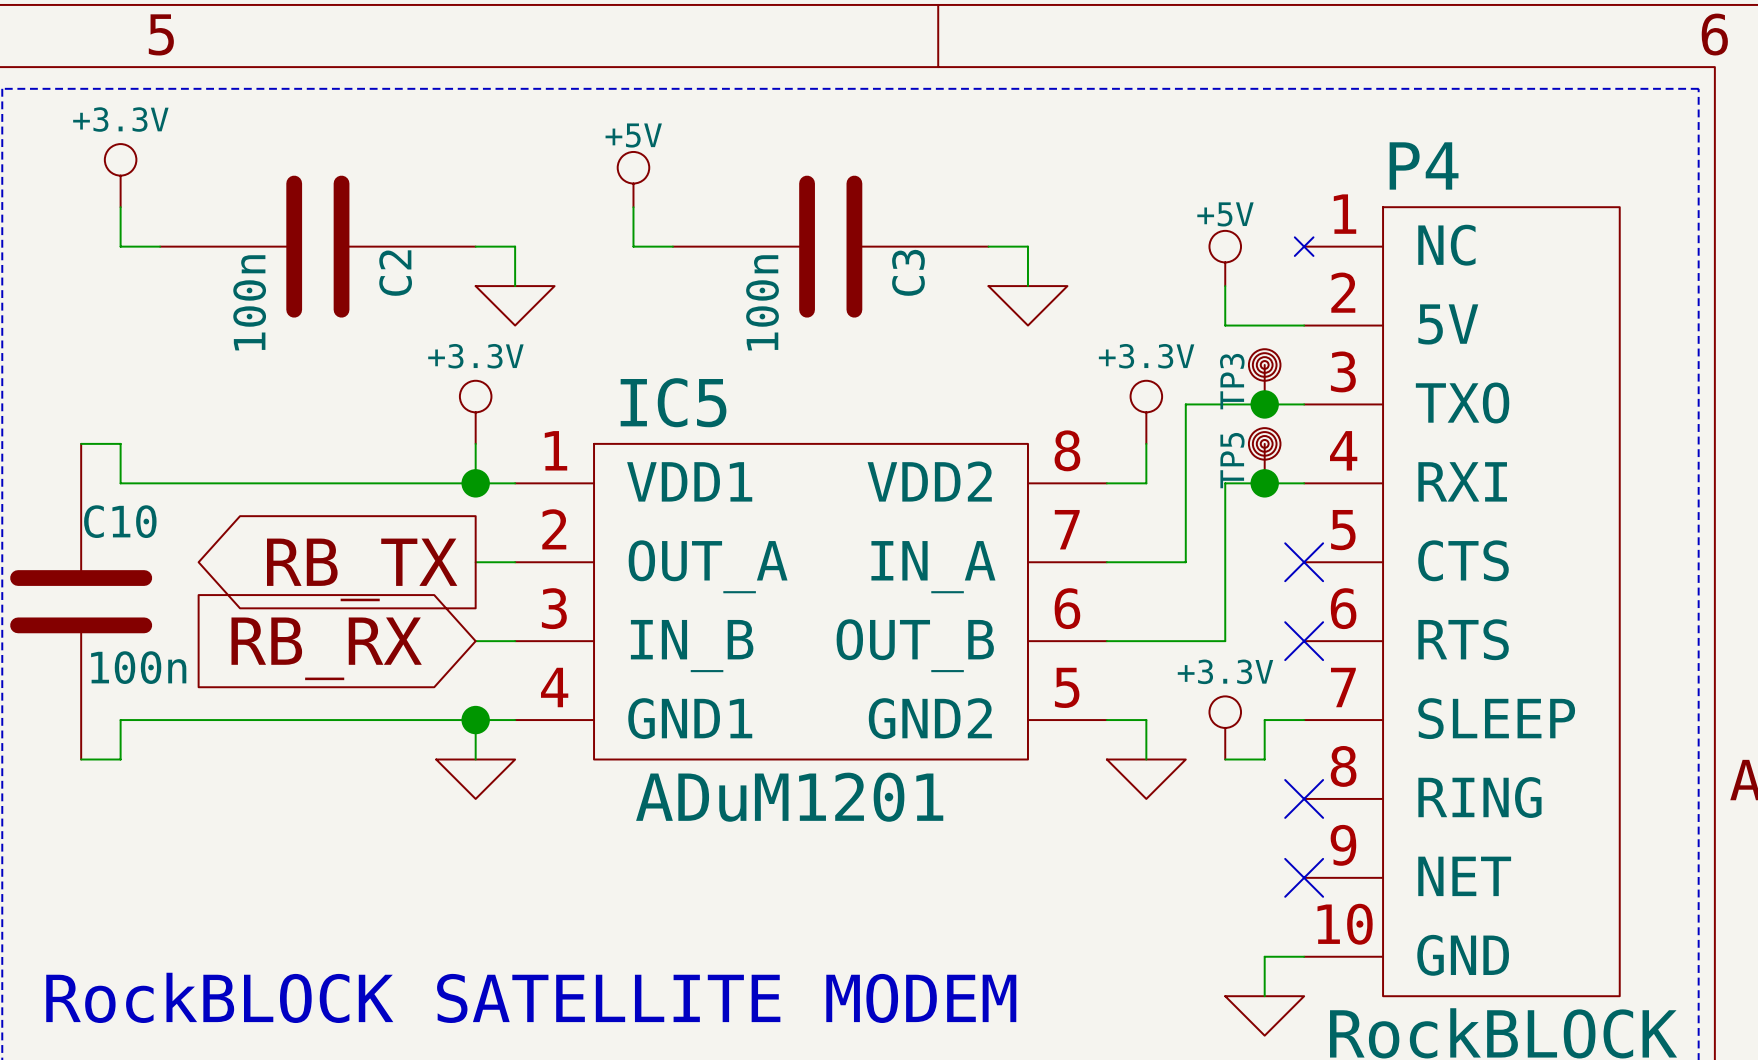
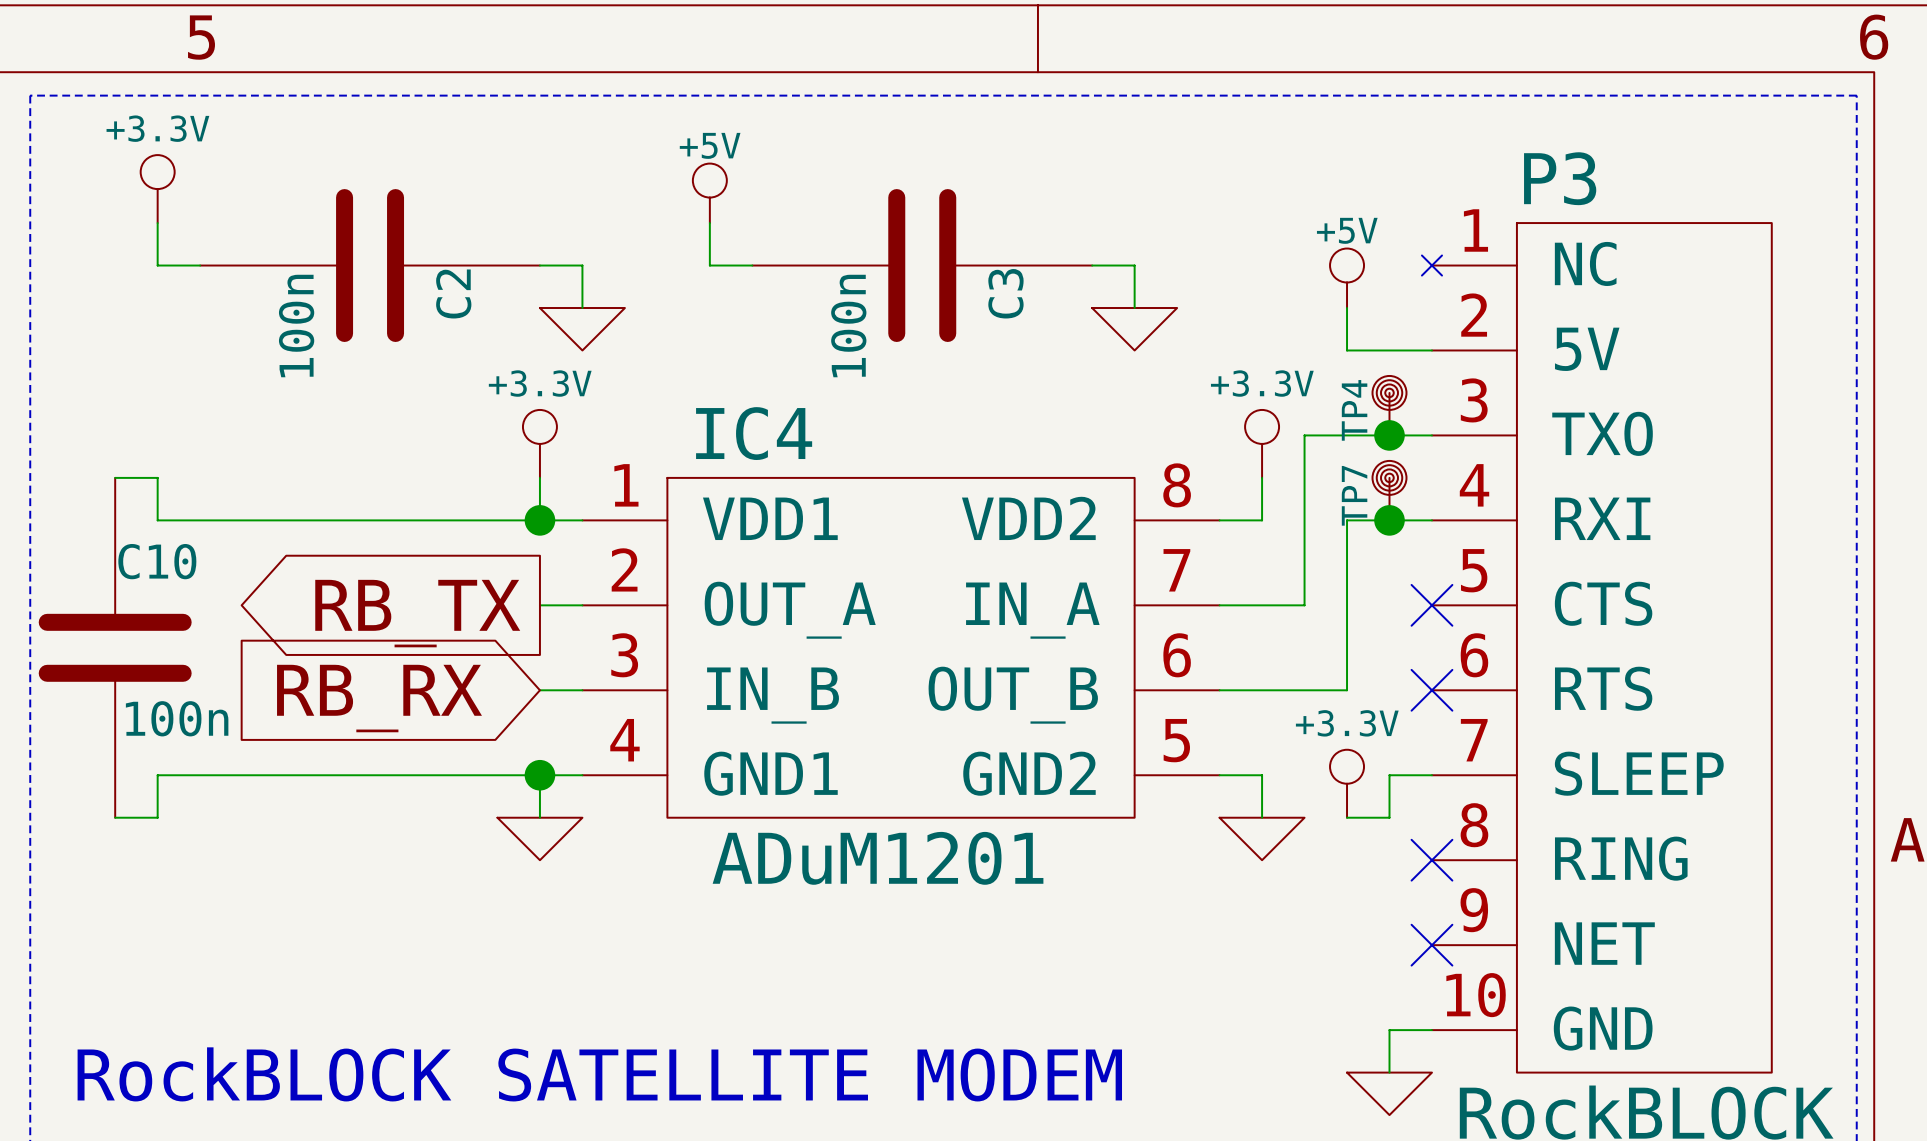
P4 name: P4 (1424, 165) -> P3 (1560, 178)
TP3 name: TP3 (1232, 381) -> TP4 (1354, 410)
IC5 name: IC5 (673, 402) -> IC4 (754, 433)
TP5 name: TP5 (1232, 460) -> TP7 (1354, 495)

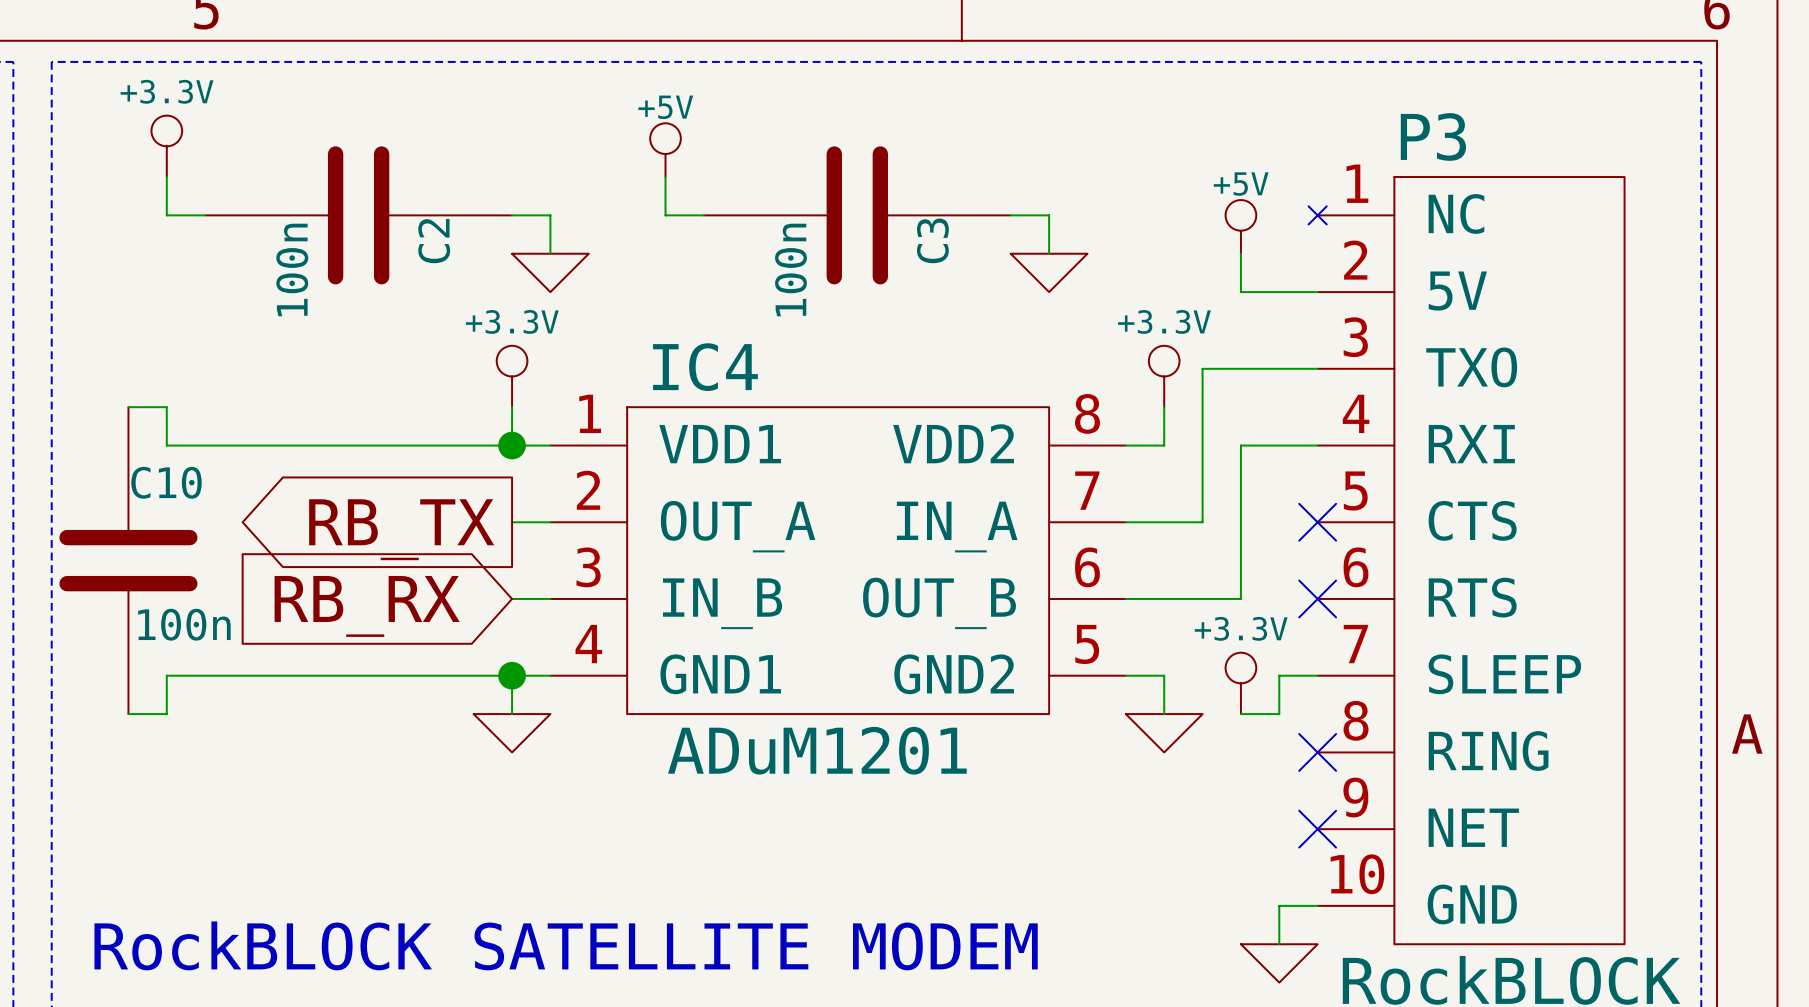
TP4: (1389, 405) -> none
junction: (1389, 435) -> none
TP7: (1389, 490) -> none
junction: (1389, 520) -> none

